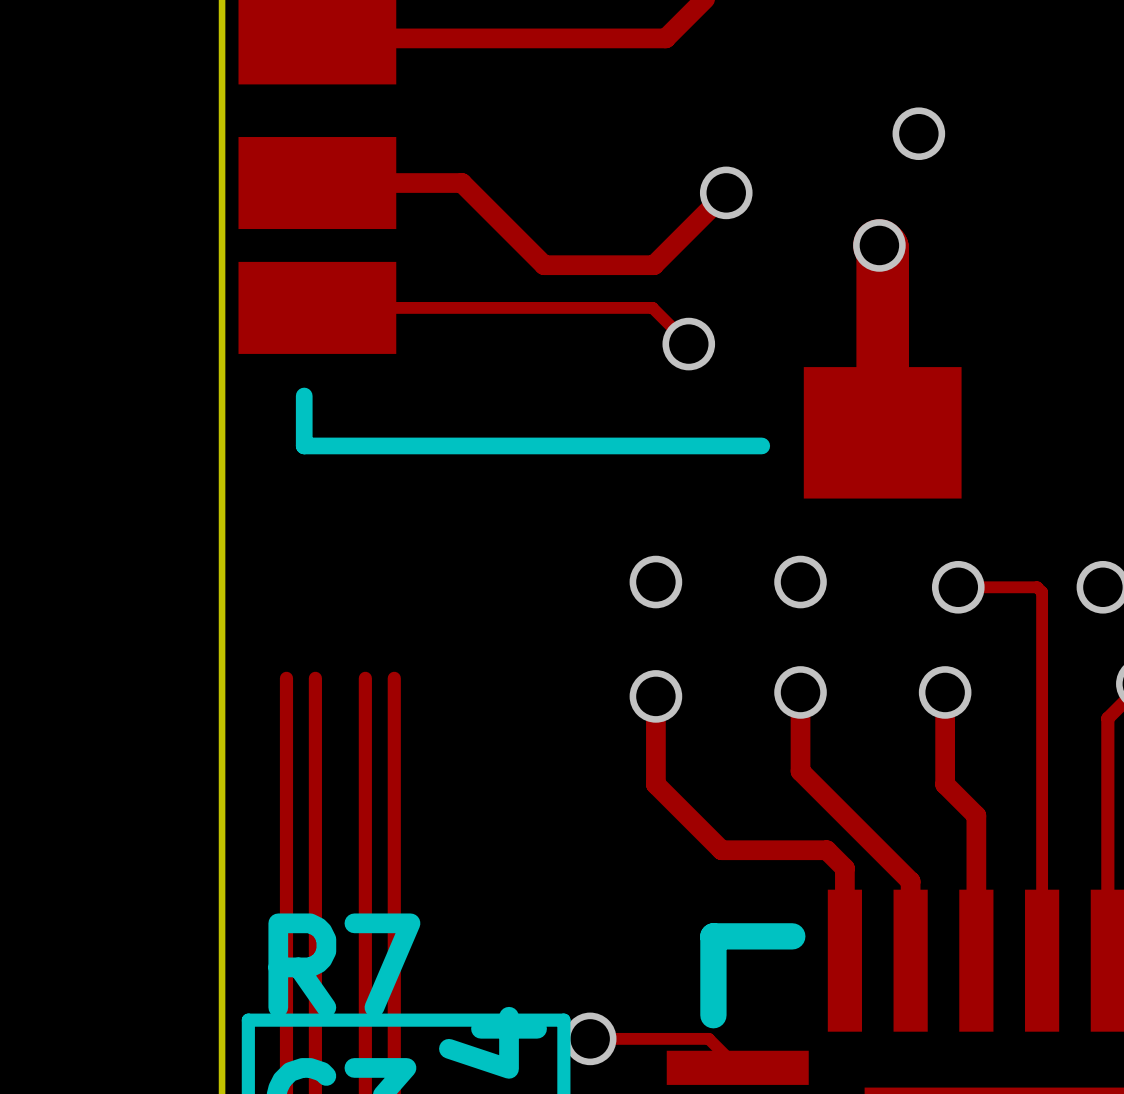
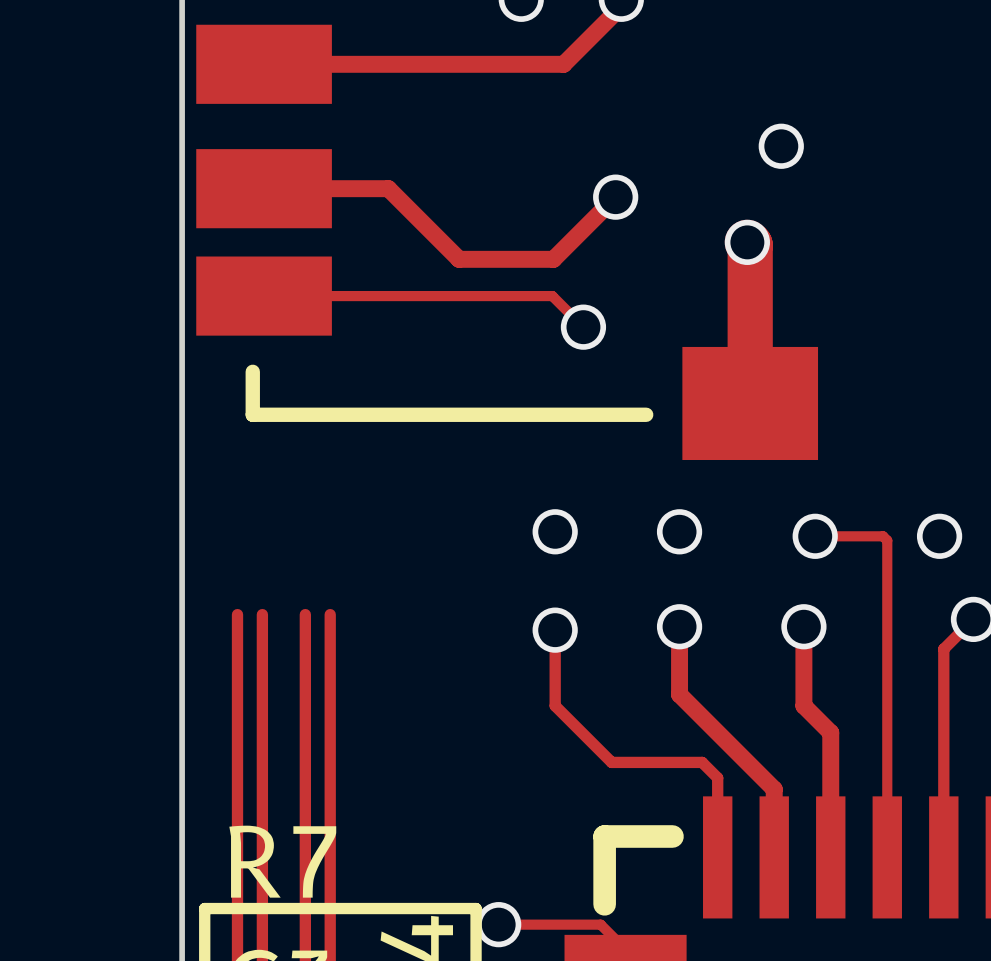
track width: thick (655, 696) (655, 784) (721, 850) (826, 850) (844, 868) (844, 960) -> thin (555, 630) (555, 705) (611, 762) (702, 762) (717, 777) (717, 857)

